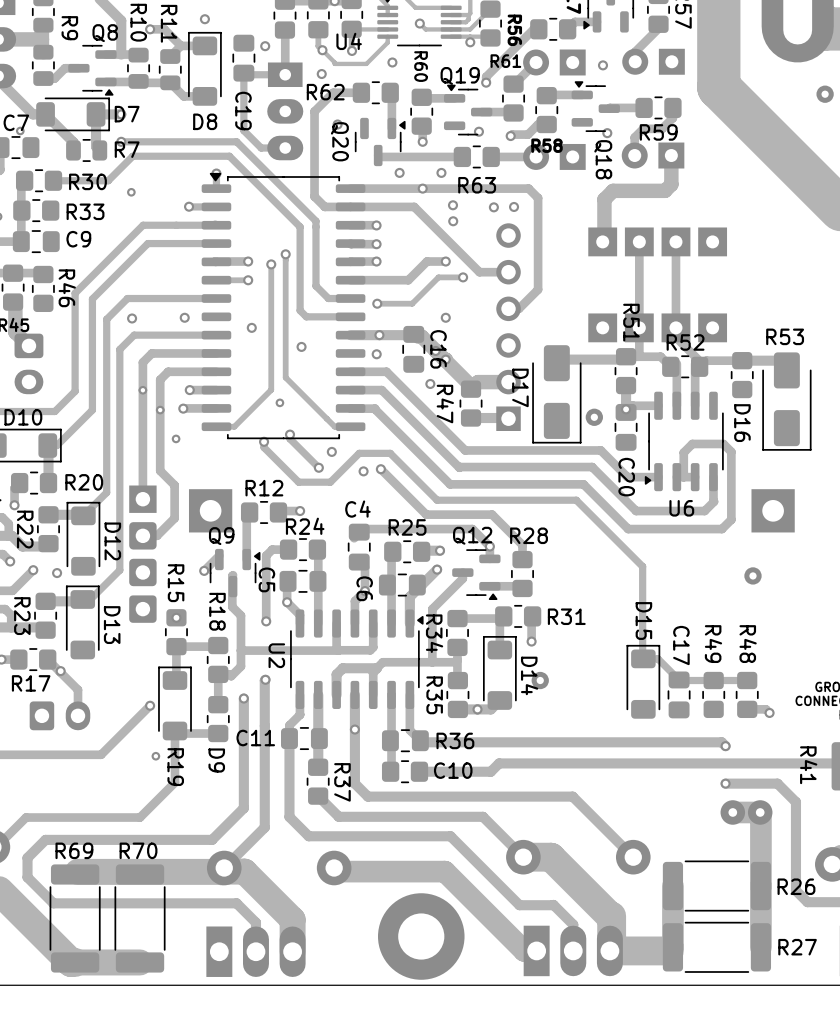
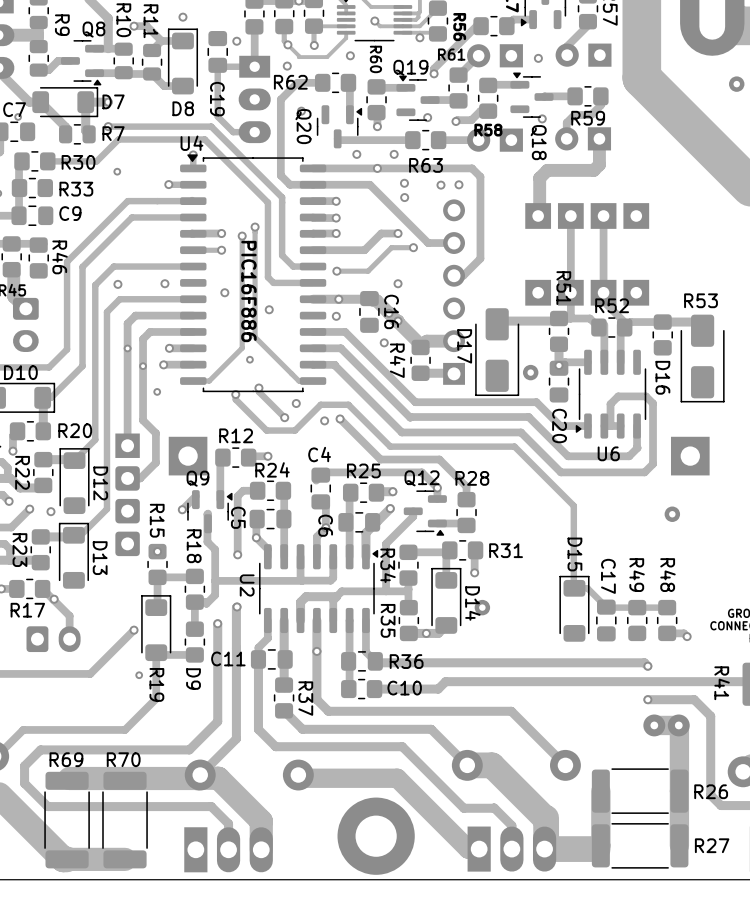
U4 name position: U4 (349, 41) -> U4 (191, 143)
text: none -> PIC16F886 (248, 291)

